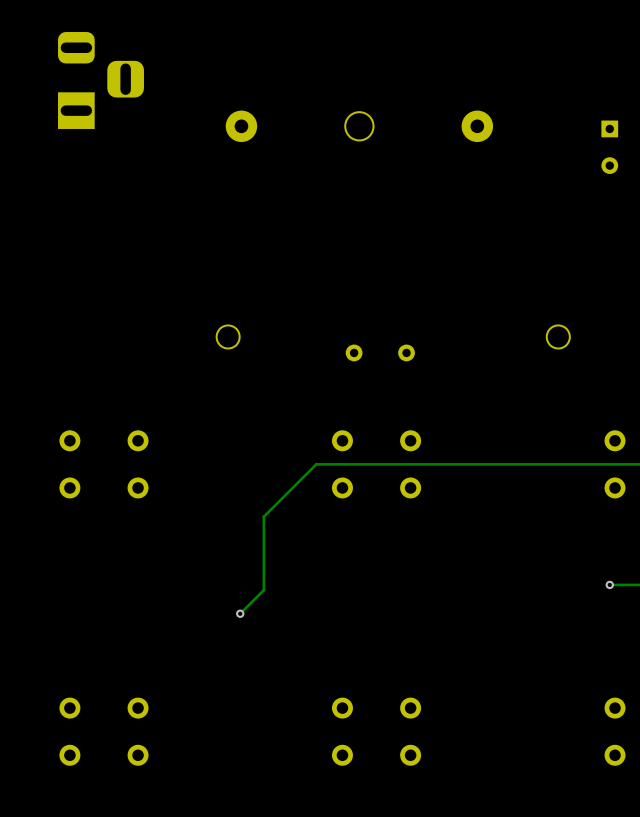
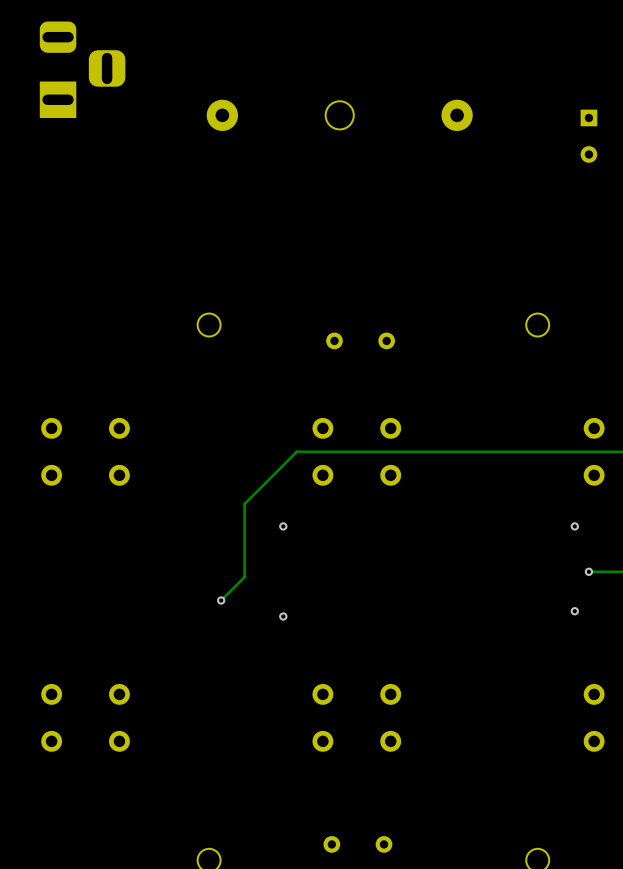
via: none -> (283, 526)
via: none -> (574, 526)
via: none -> (574, 611)
via: none -> (283, 616)

